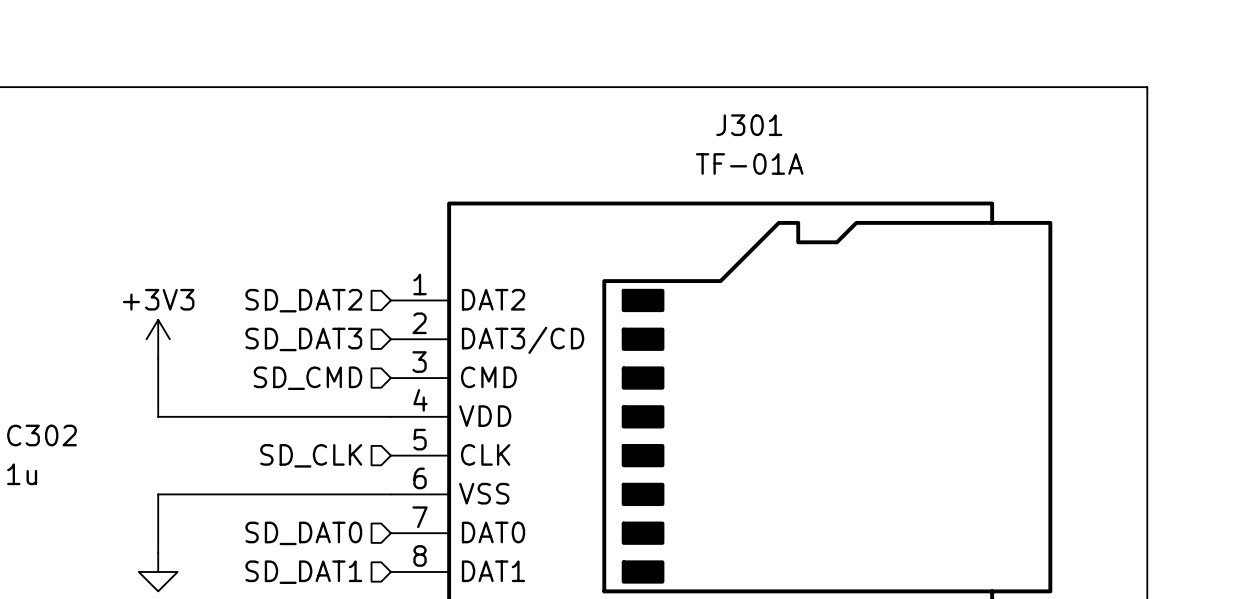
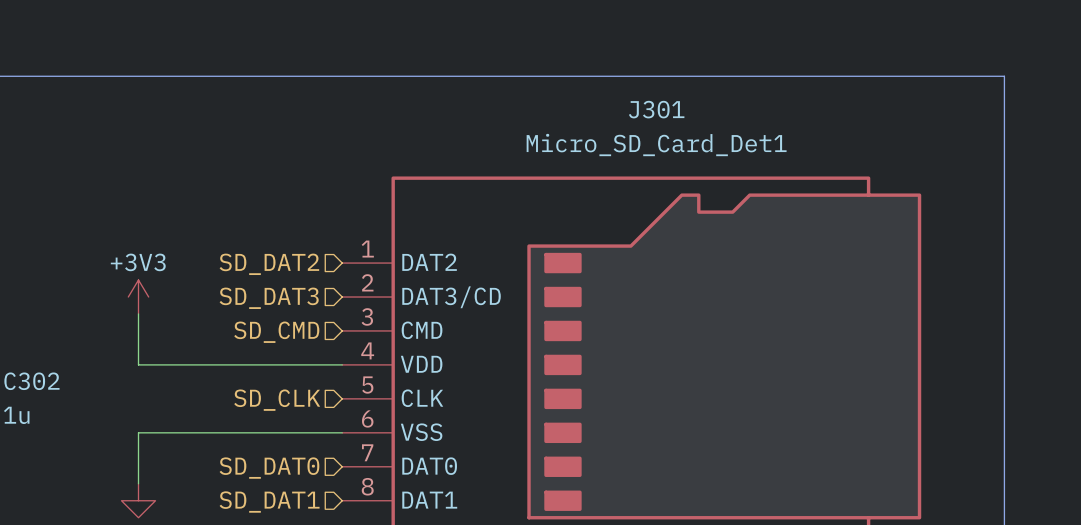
J301 value: TF-01A (749, 163) -> Micro_SD_Card_Det1 (656, 145)

